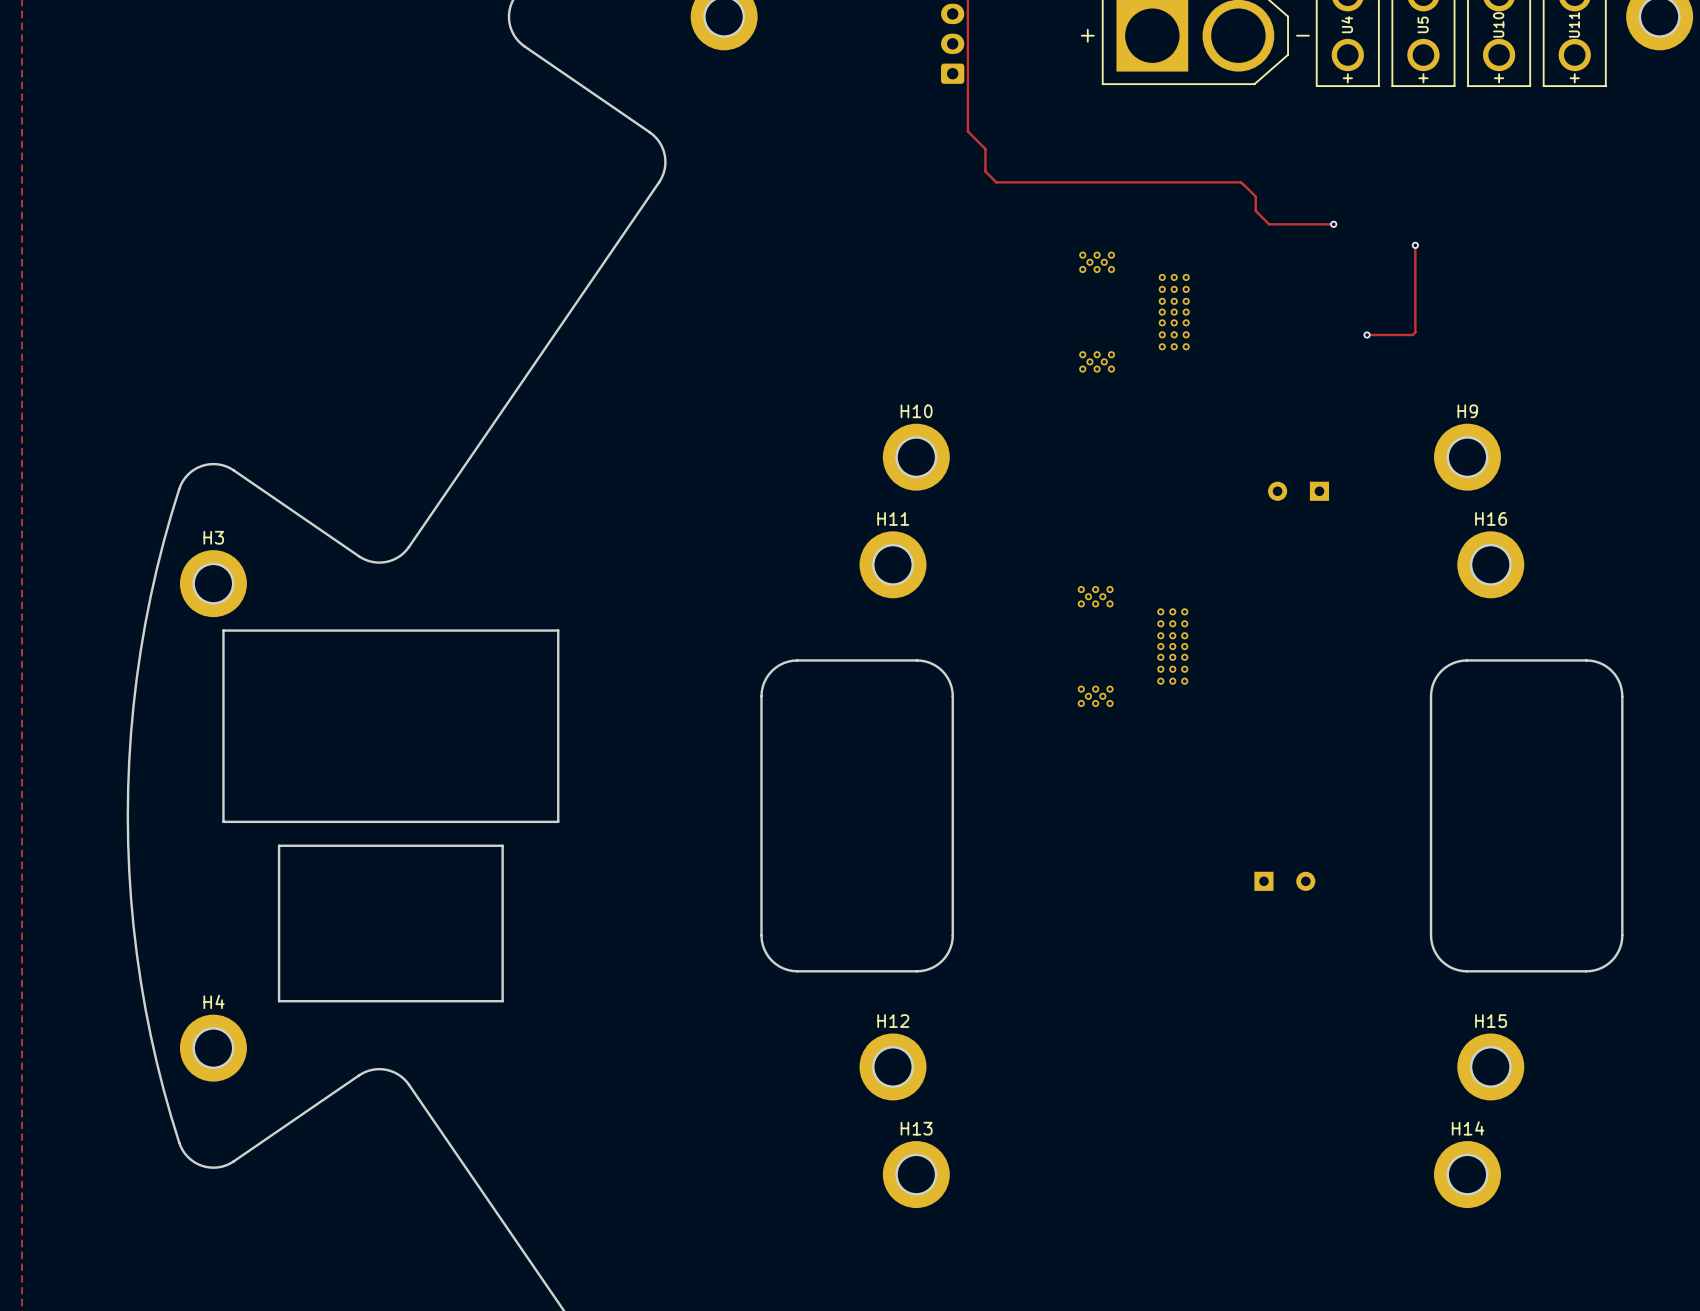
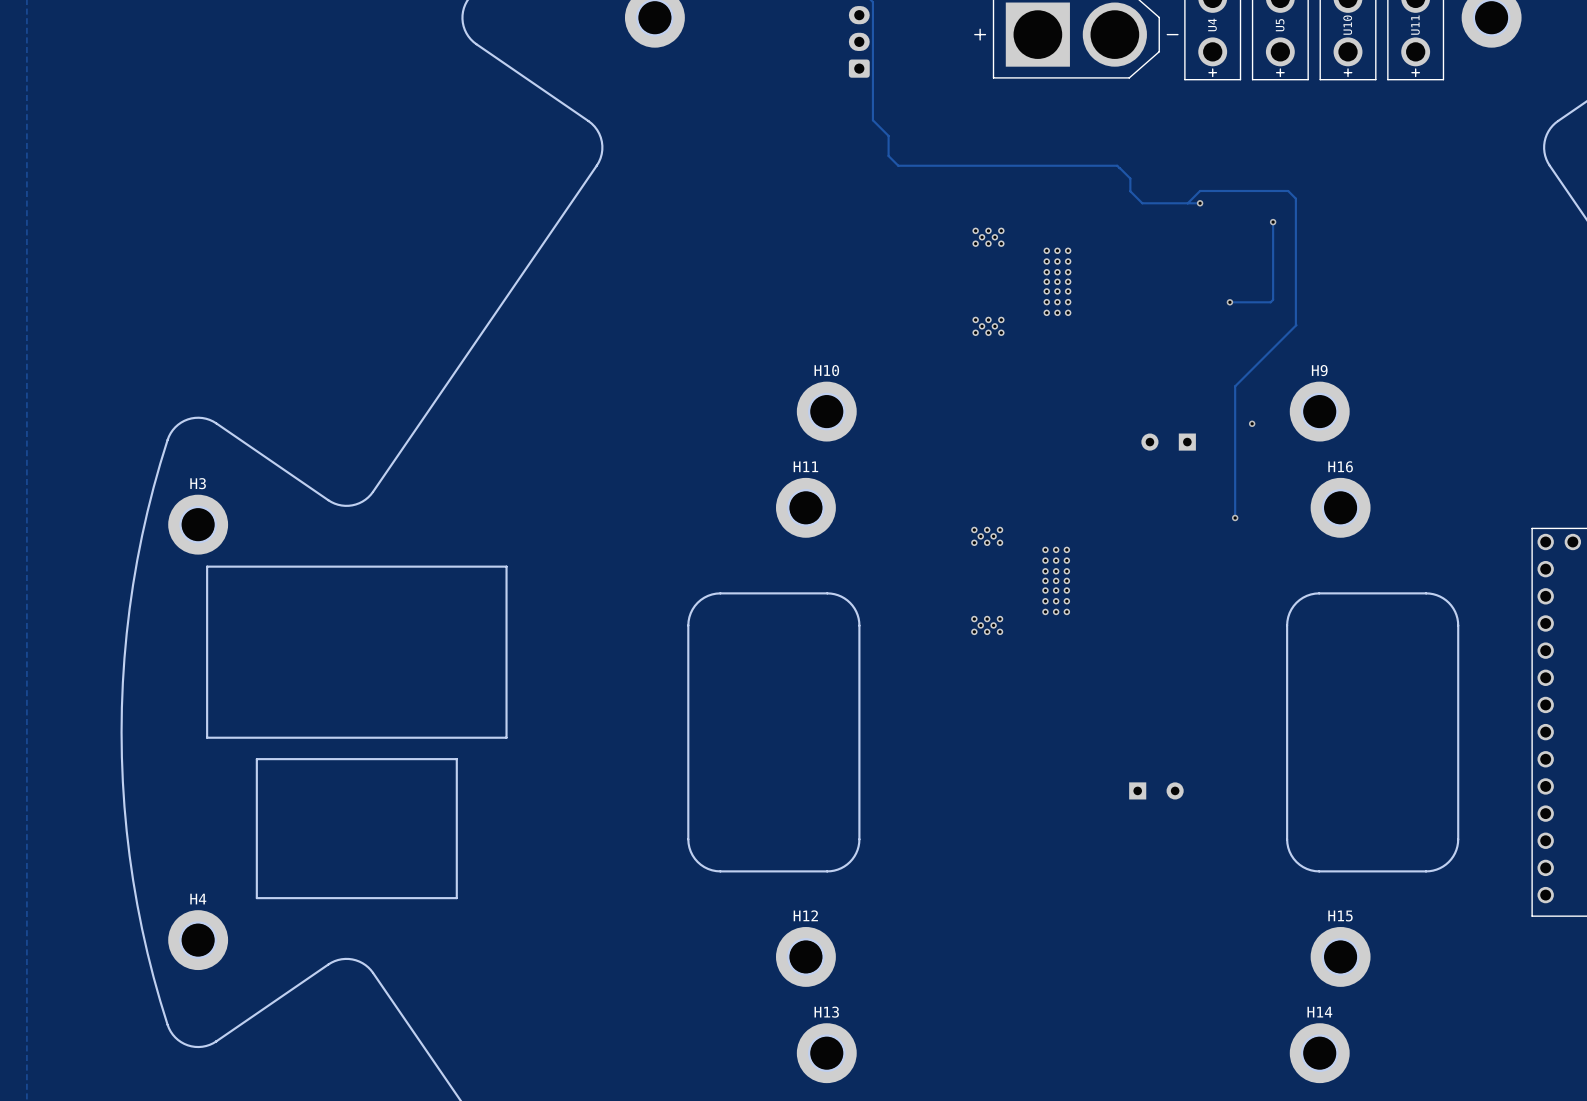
track: none -> (1187, 203) (1200, 190) (1288, 190) (1295, 198) (1296, 325) (1235, 386) (1235, 519)
via: none -> (1252, 423)
via: none -> (1235, 517)

